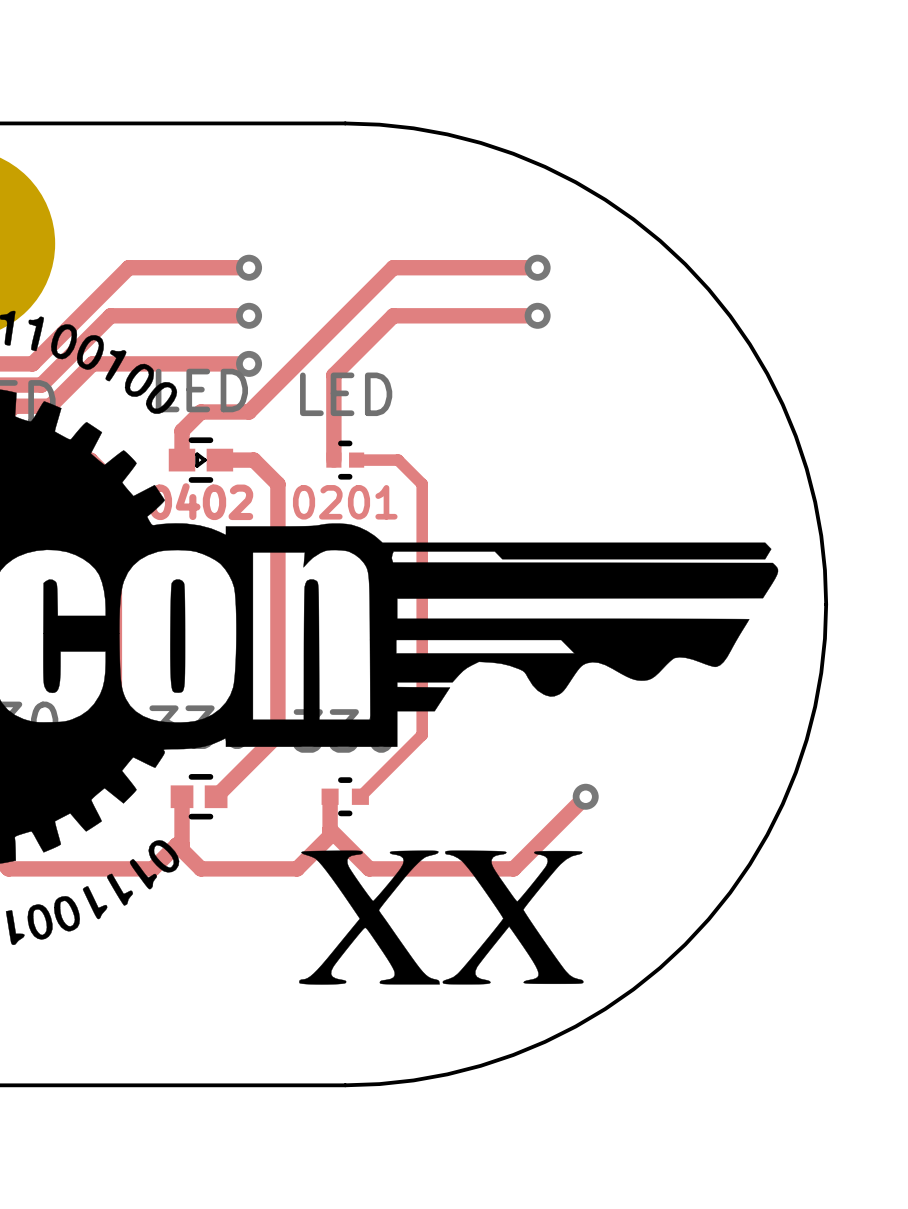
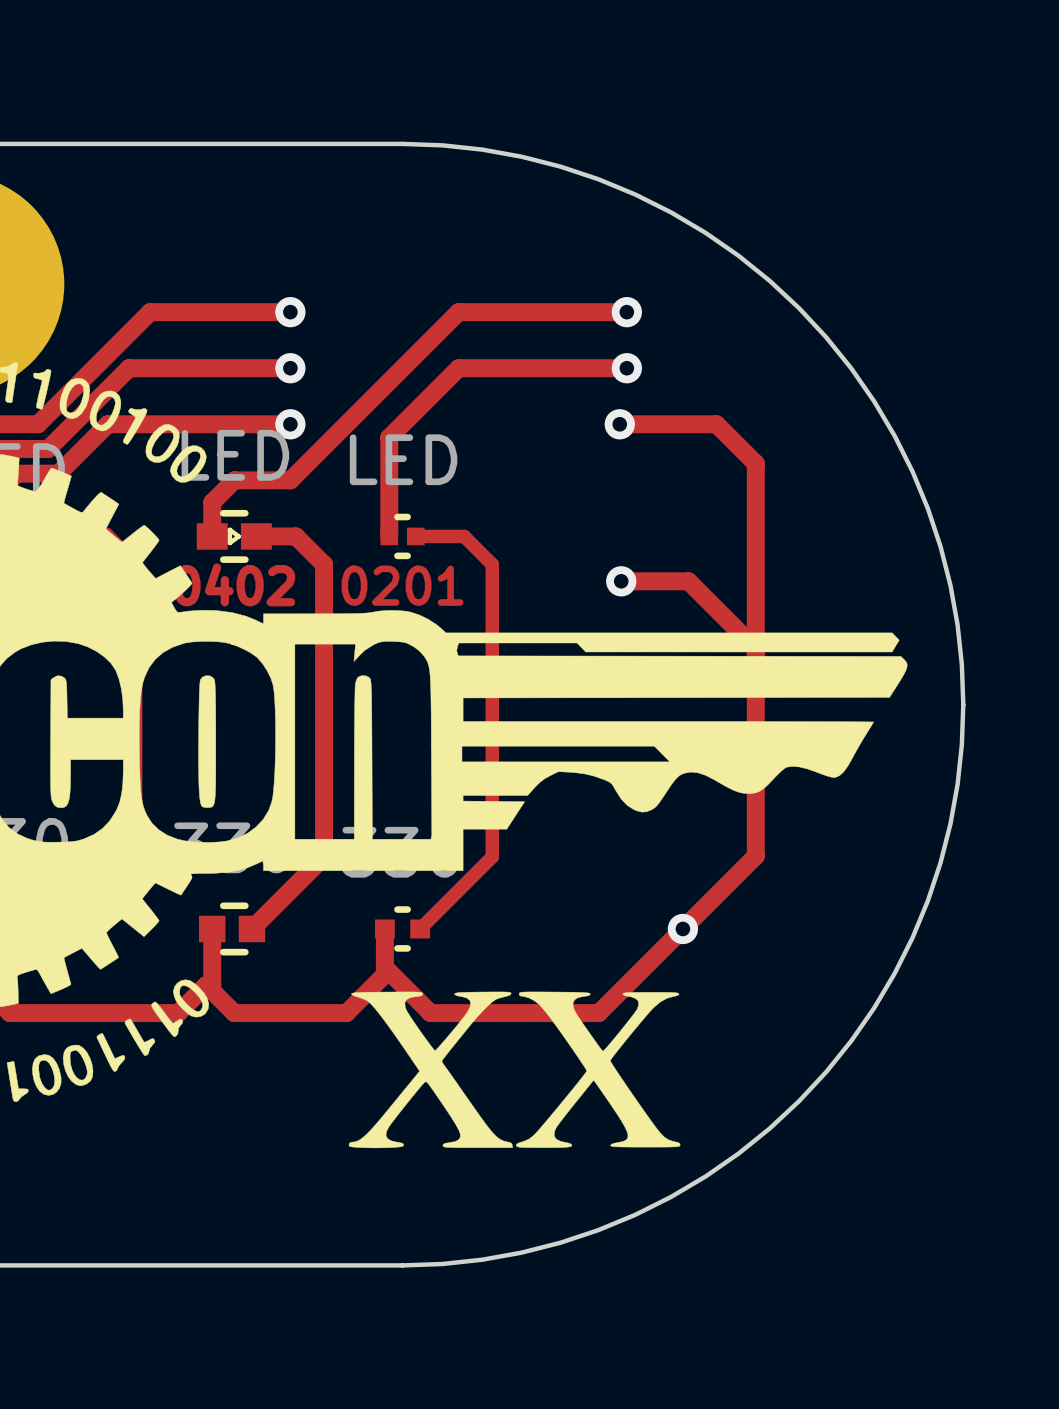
track: none -> (619, 424) (716, 424) (755, 463) (755, 856) (682, 928)
via: none -> (619, 424)
track: none -> (621, 581) (688, 581) (755, 648)
via: none -> (621, 581)

